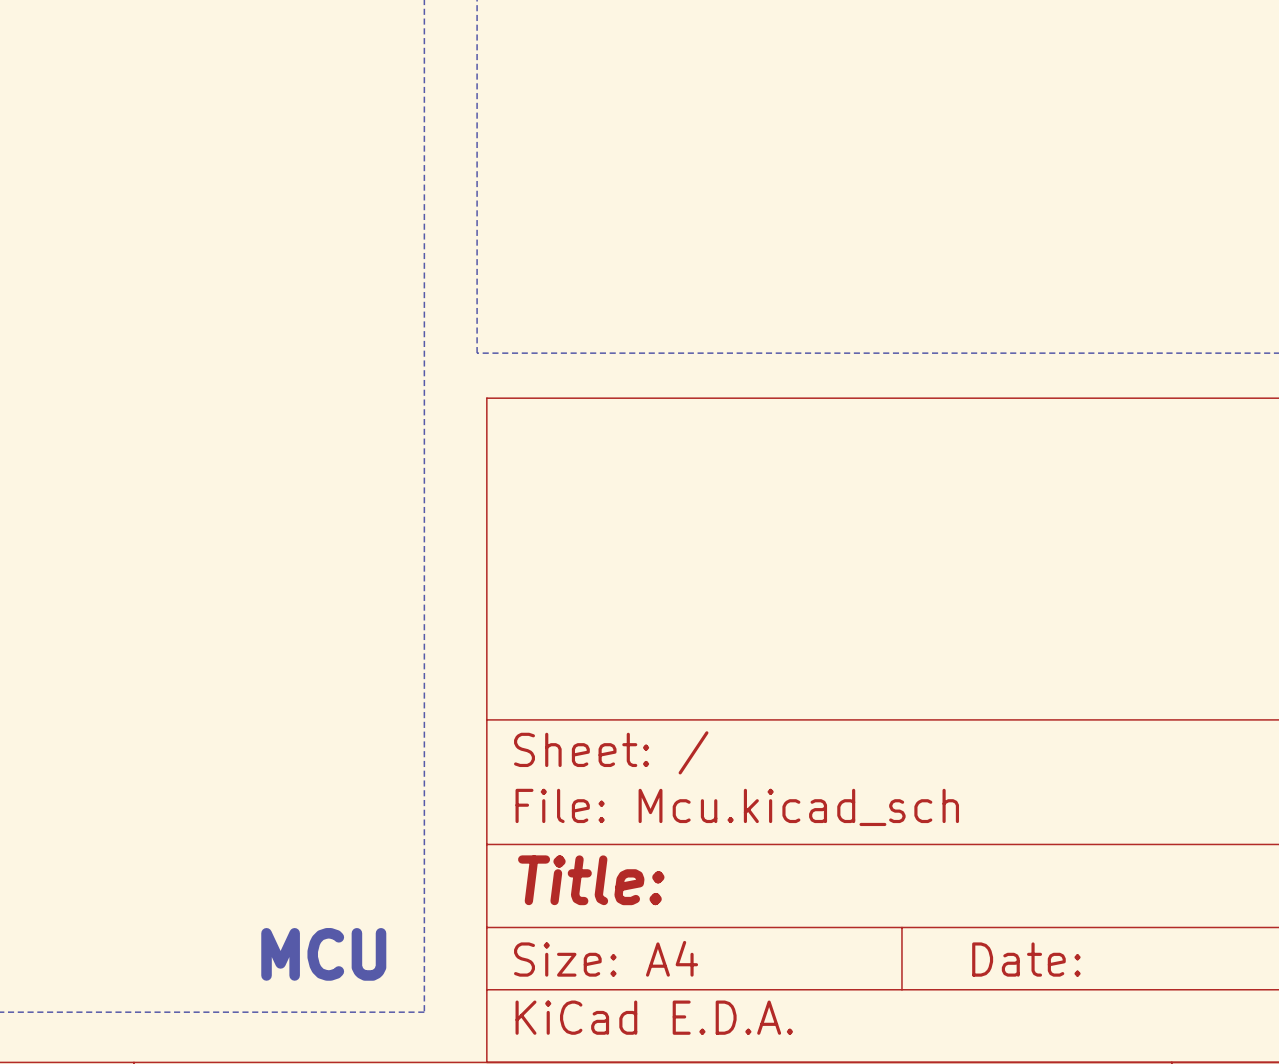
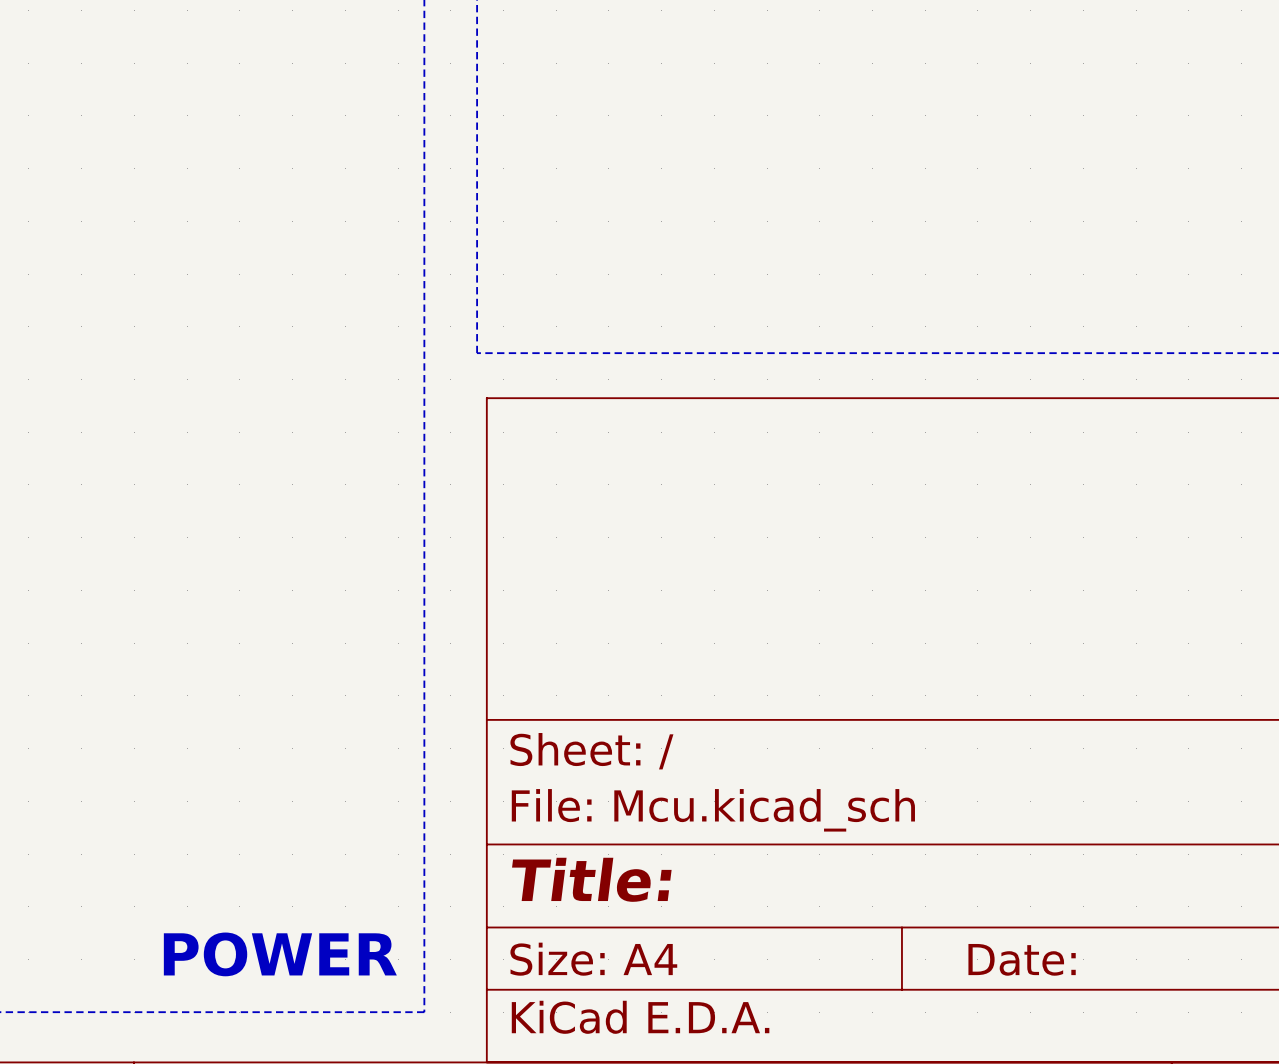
text: MCU (323, 954) -> POWER (280, 954)

